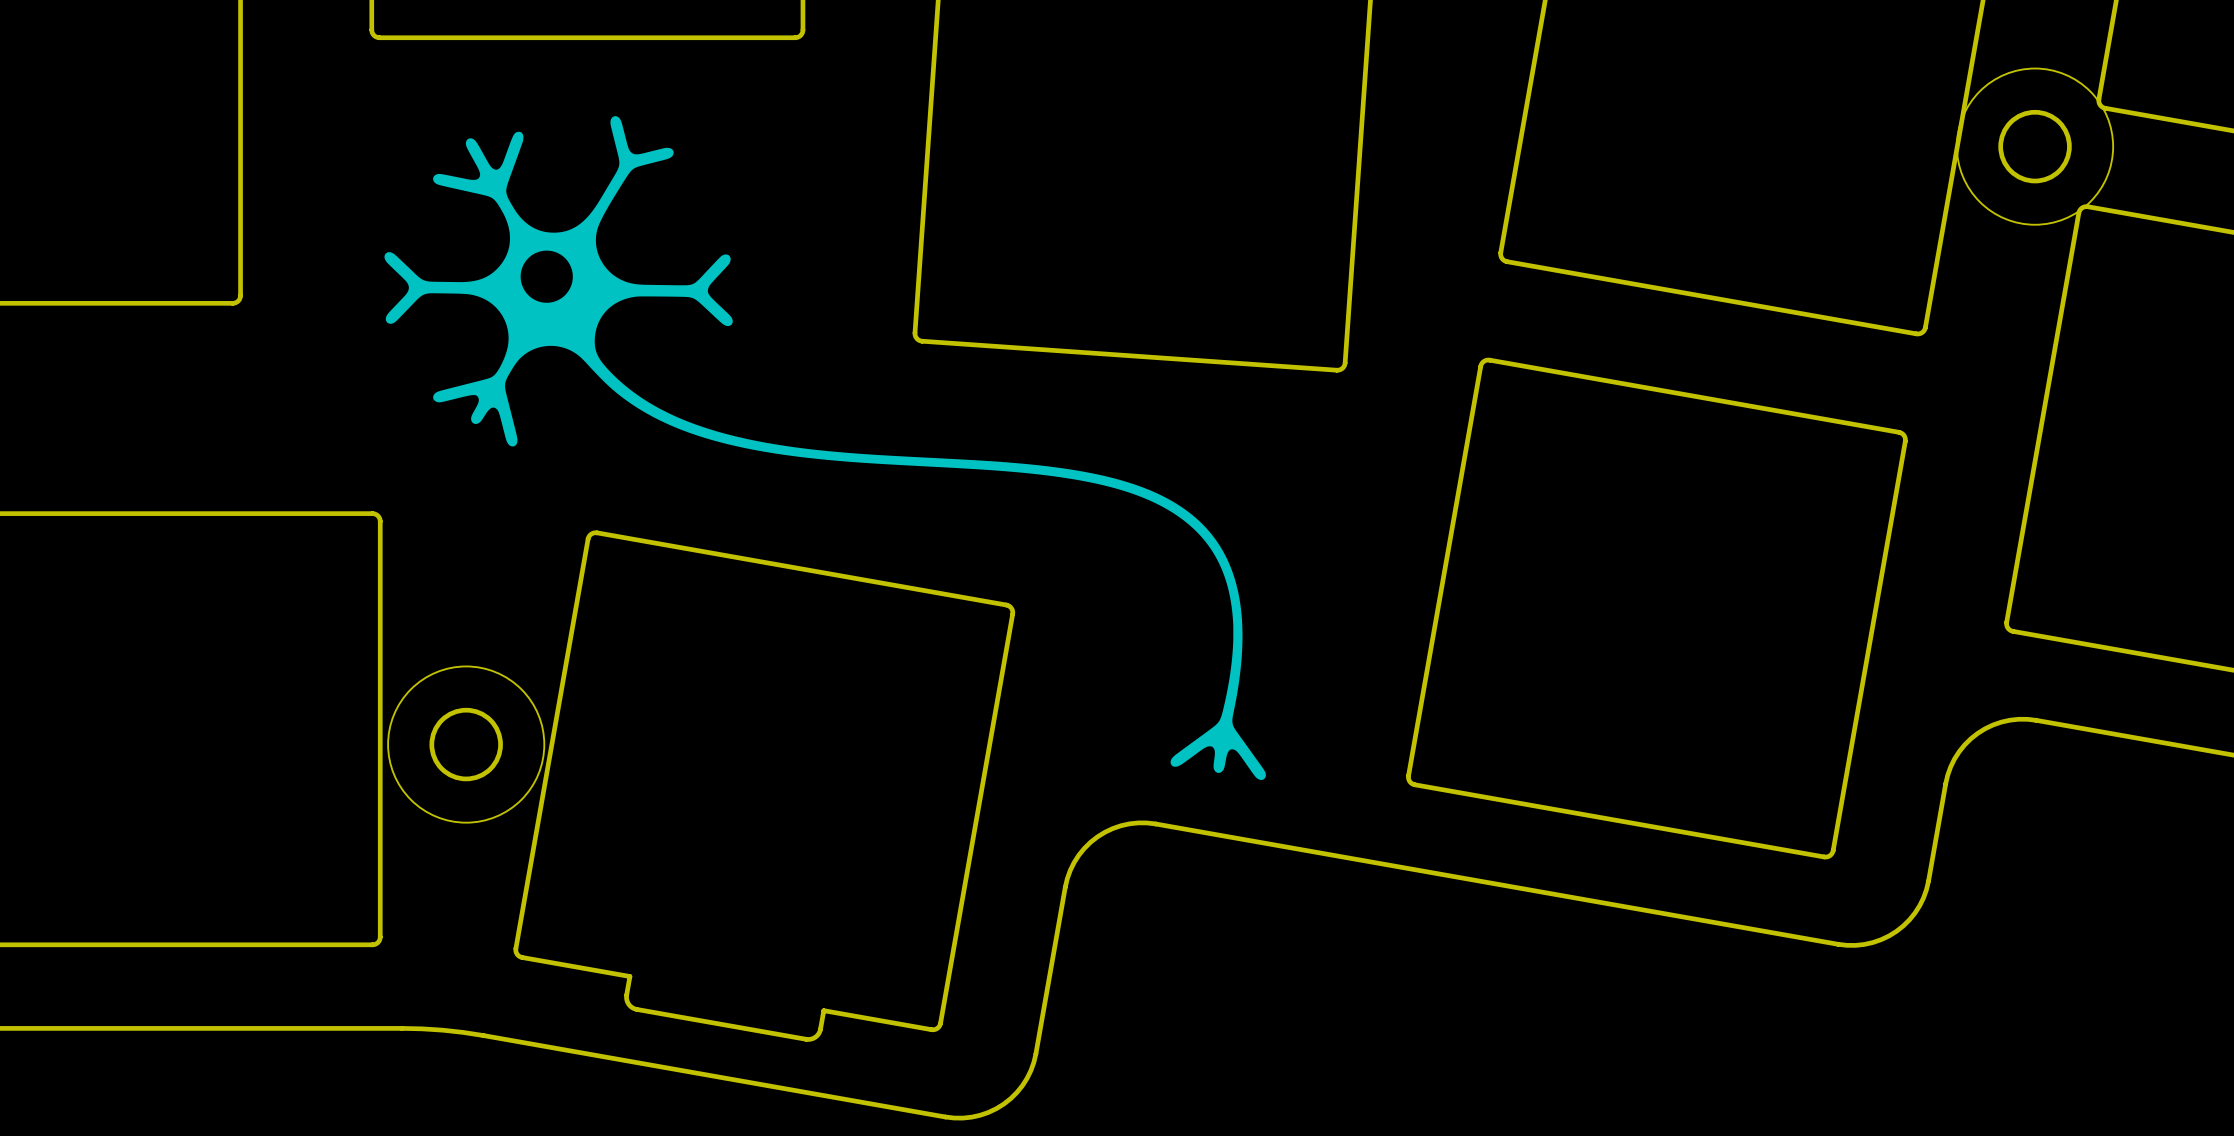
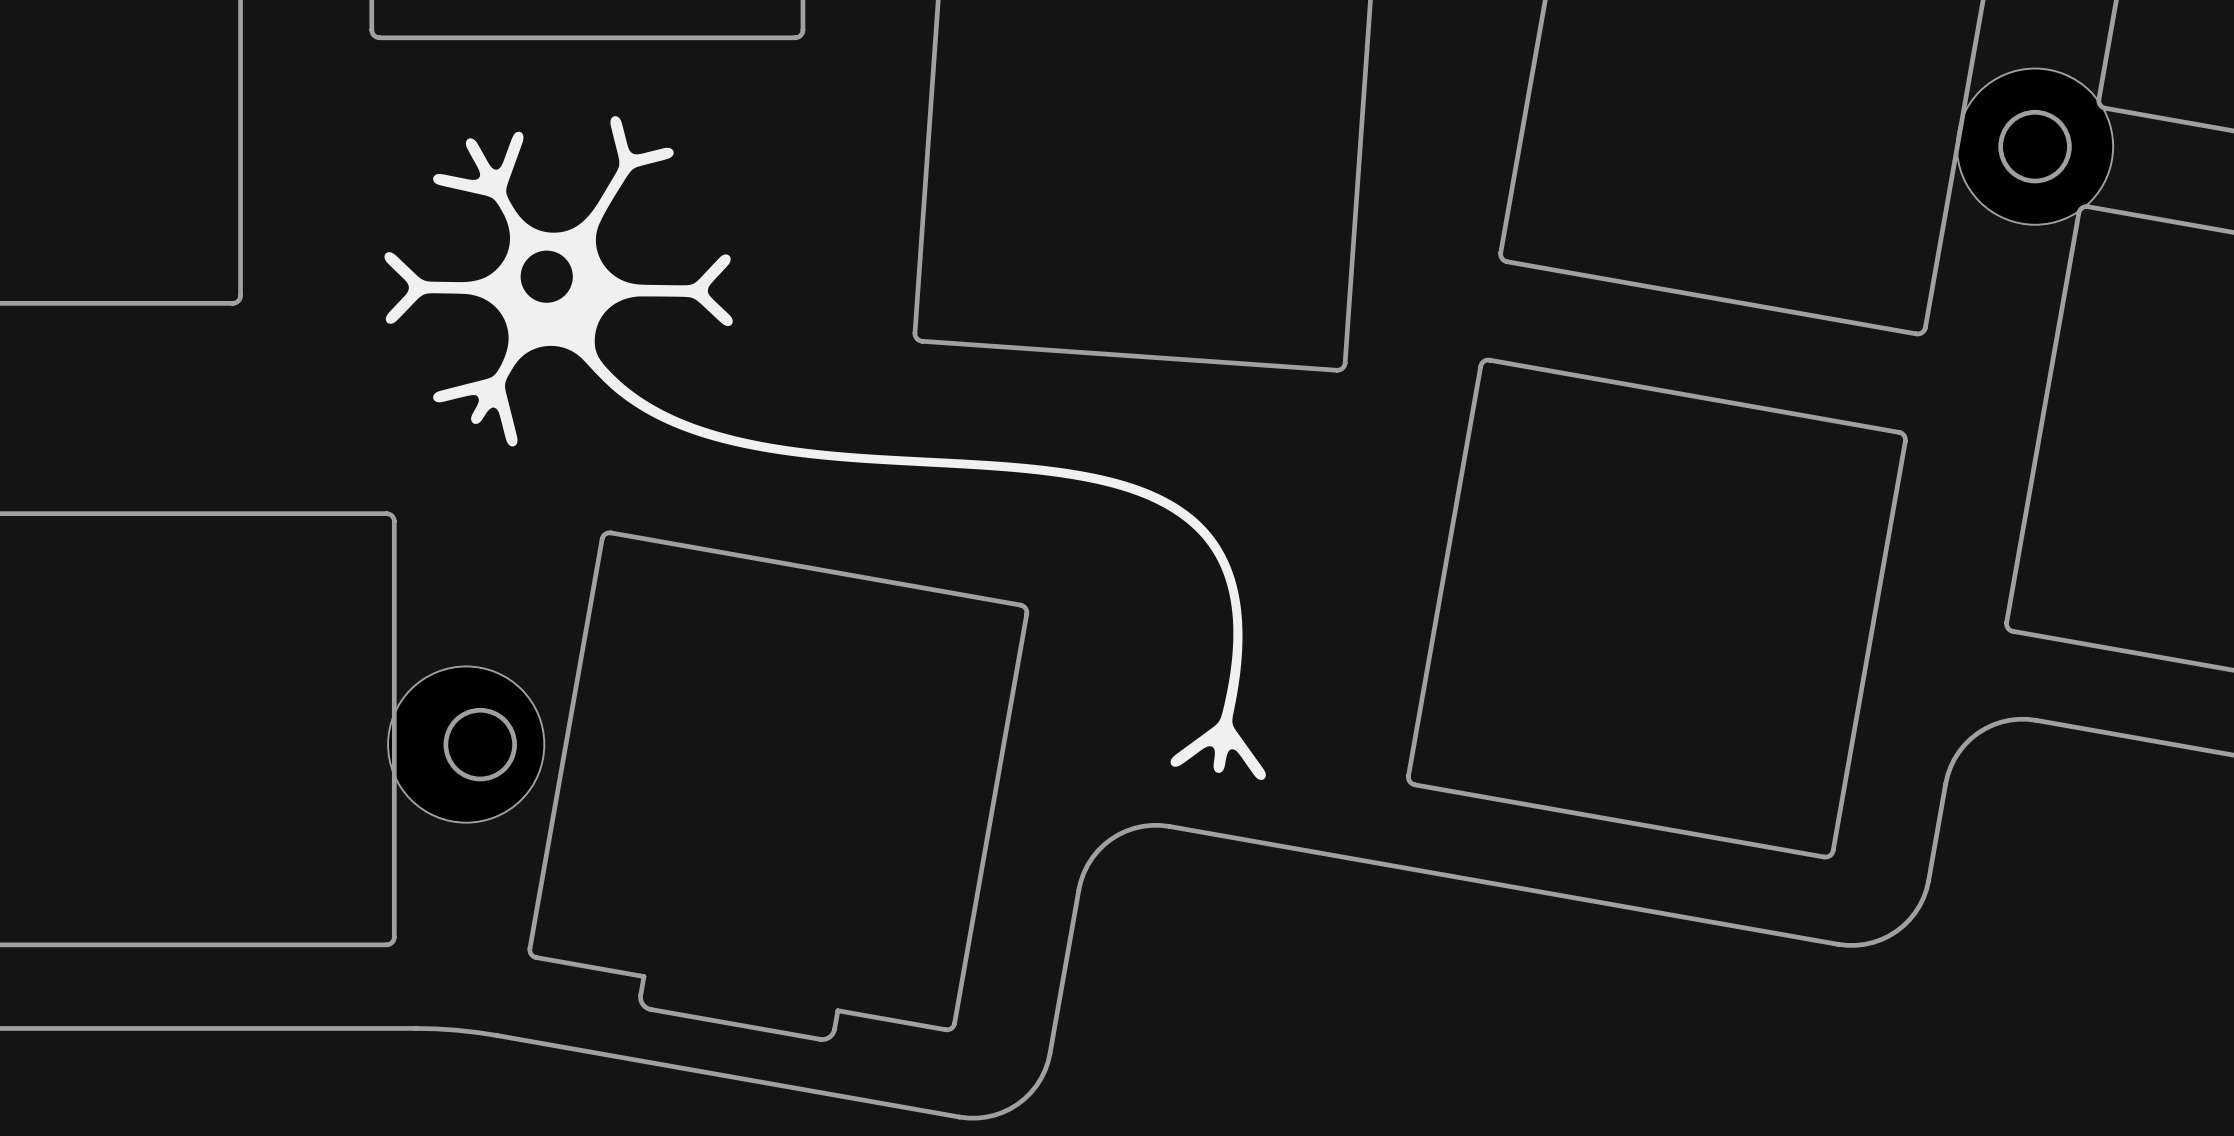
board edge: (372, 513) (377, 515) (380, 521) (380, 936) (377, 942) (372, 944) -> (372, 513) (389, 514) (394, 521) (394, 937) (389, 944) (372, 944)
round board edge position: (466, 744) -> (480, 744)
board edge: (1169, 826) (1147, 822) (1121, 825) (1097, 836) (1078, 855) (1070, 870) (1065, 887) (1035, 1053) (1031, 1070) (1022, 1085) (1010, 1098) (996, 1108) (980, 1115) (962, 1118) (945, 1117) (483, 1035) (442, 1030) (401, 1028) -> (1169, 826) (1143, 826) (1118, 834) (1104, 844) (1087, 865) (1078, 889) (1049, 1053) (1045, 1070) (1036, 1085) (1024, 1098) (1010, 1108) (994, 1115) (976, 1118) (959, 1117) (477, 1032) (401, 1028)
board edge: (626, 994) (629, 976) (522, 957) (517, 954) (515, 950) (589, 535) (597, 532) (1010, 606) (1012, 614) (938, 1027) (931, 1029) (823, 1010) (818, 1033) (814, 1038) (807, 1039) (635, 1009) (628, 1004) (626, 994) -> (611, 532) (1020, 605) (1025, 608) (1026, 614) (954, 1023) (951, 1028) (945, 1029) (837, 1010) (832, 1033) (828, 1038) (820, 1039) (649, 1009) (643, 1005) (640, 999) (643, 976) (536, 957) (531, 954) (529, 948) (602, 539) (605, 534) (611, 532)

